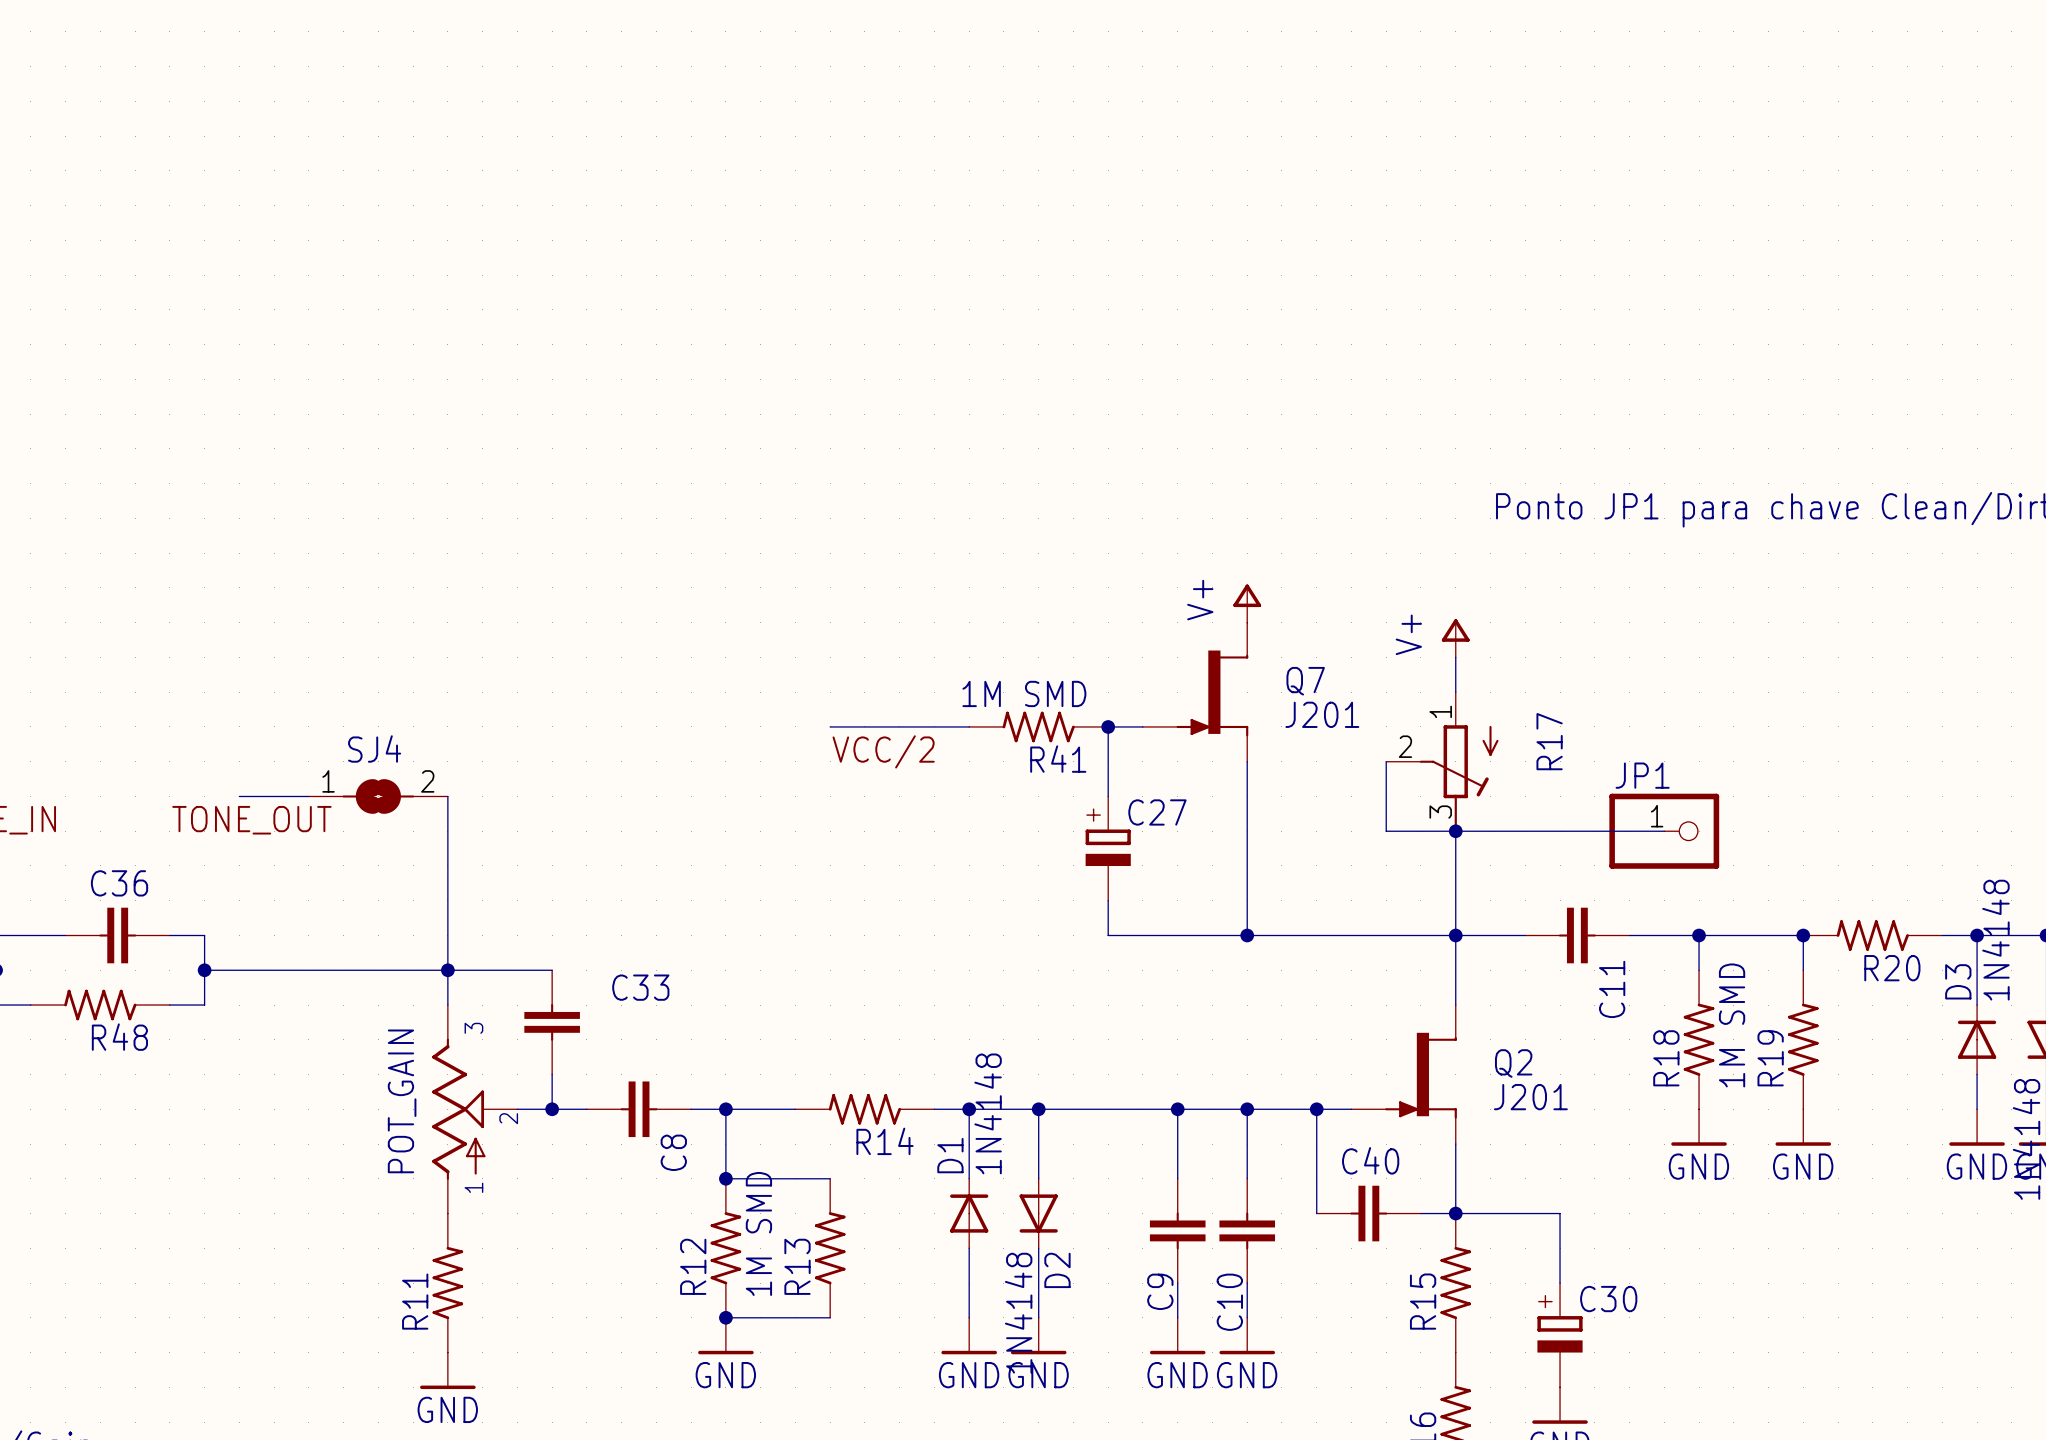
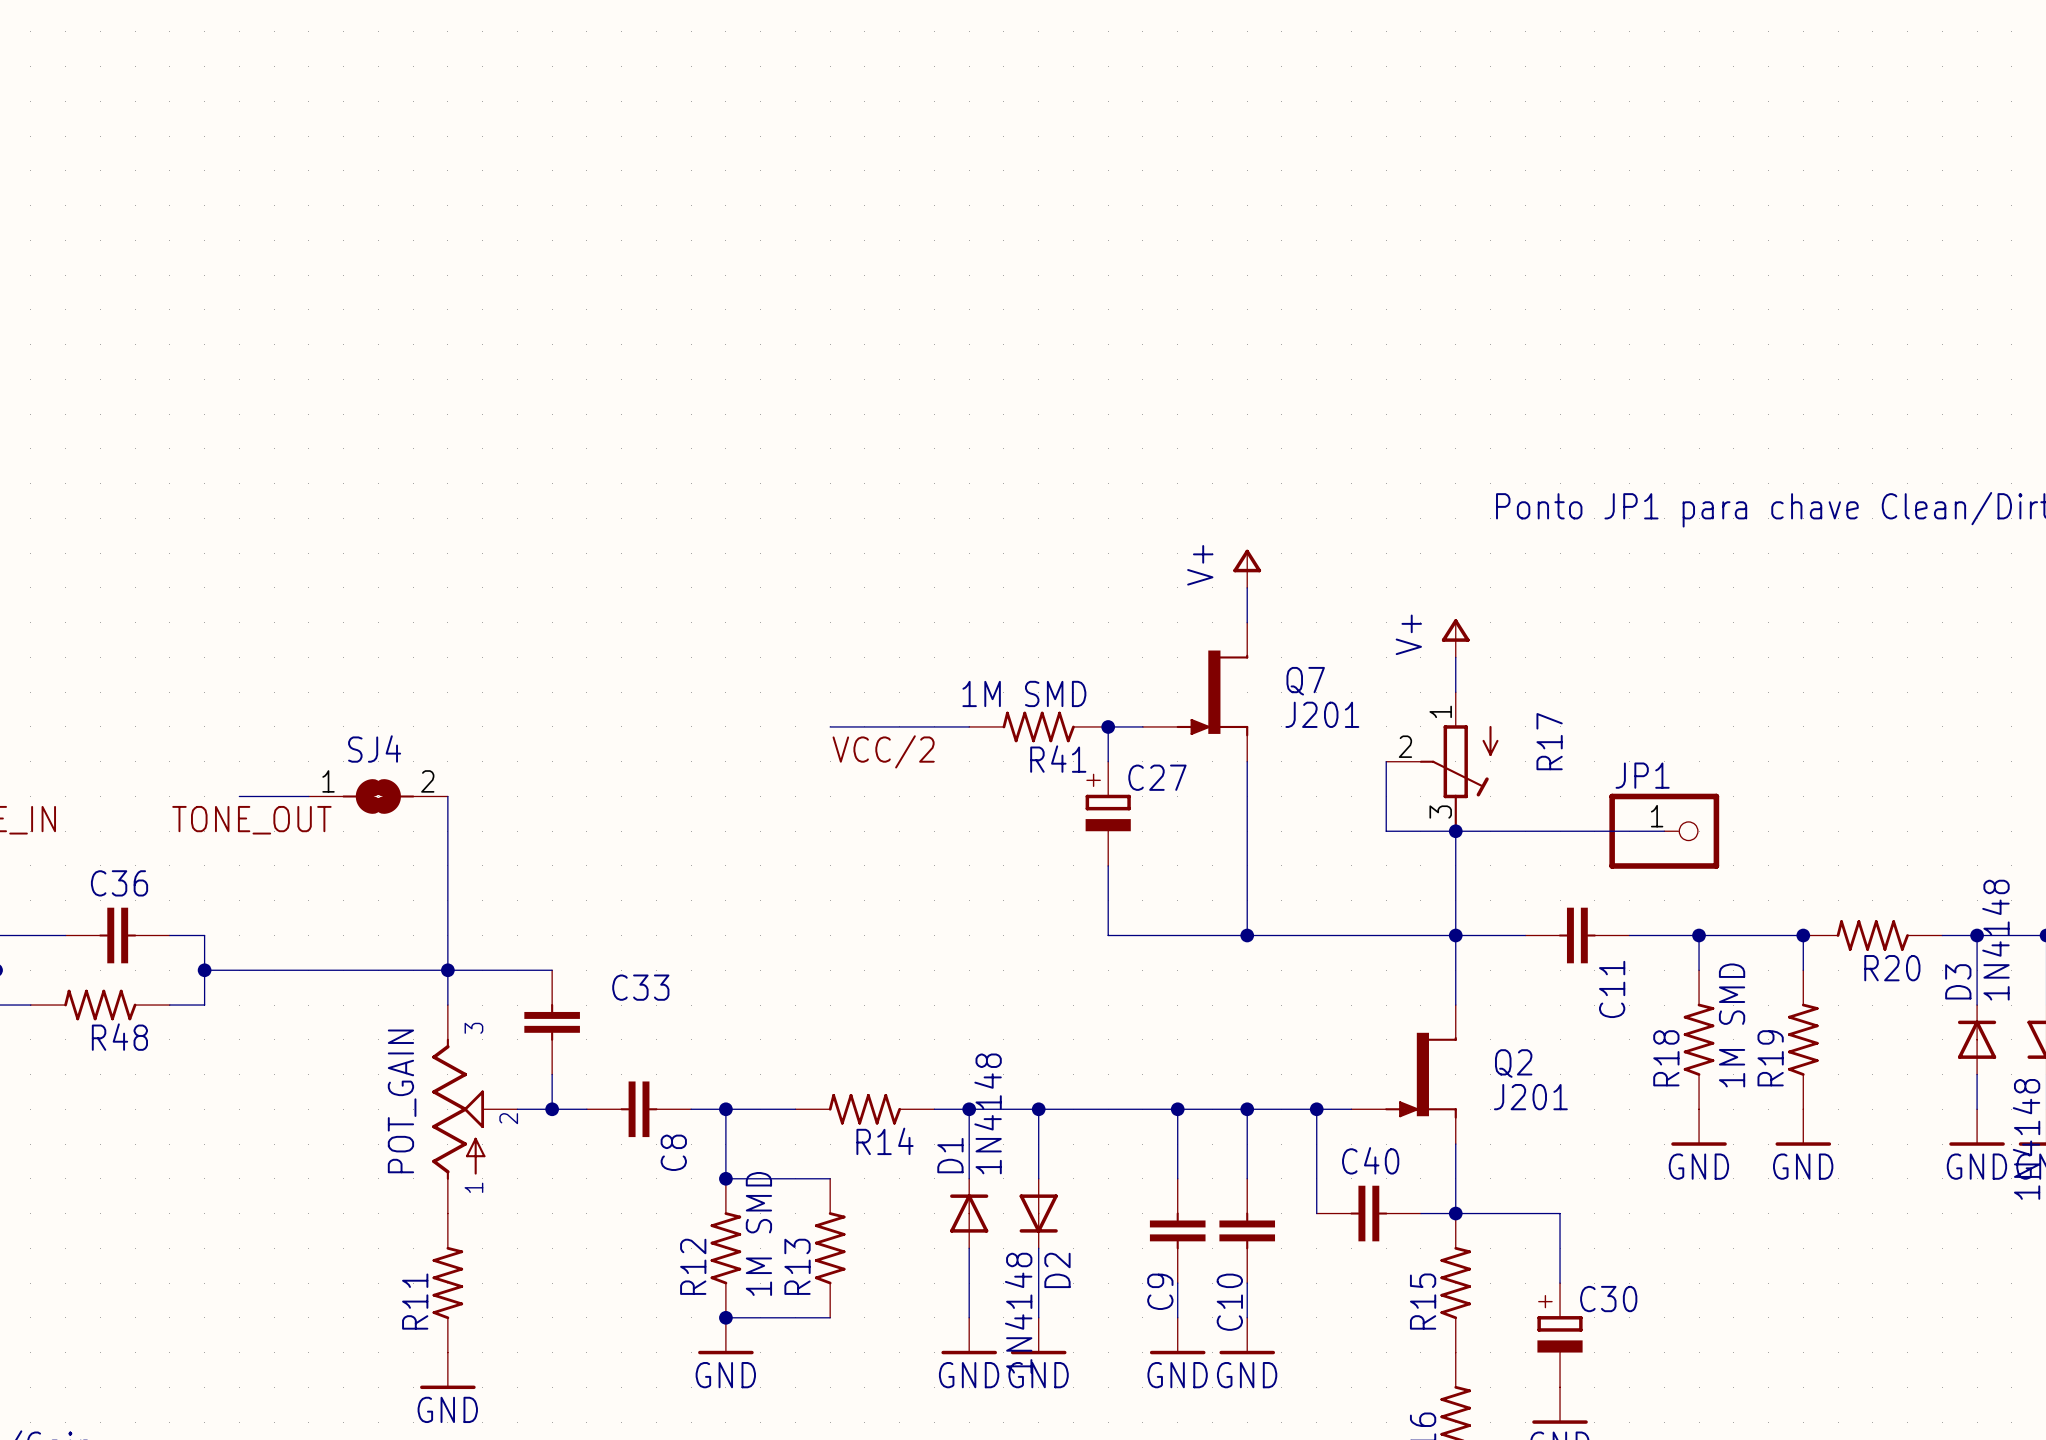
power symbol position: V+ (1247, 603) -> V+ (1247, 568)
C27 position: (1108, 848) -> (1108, 813)

